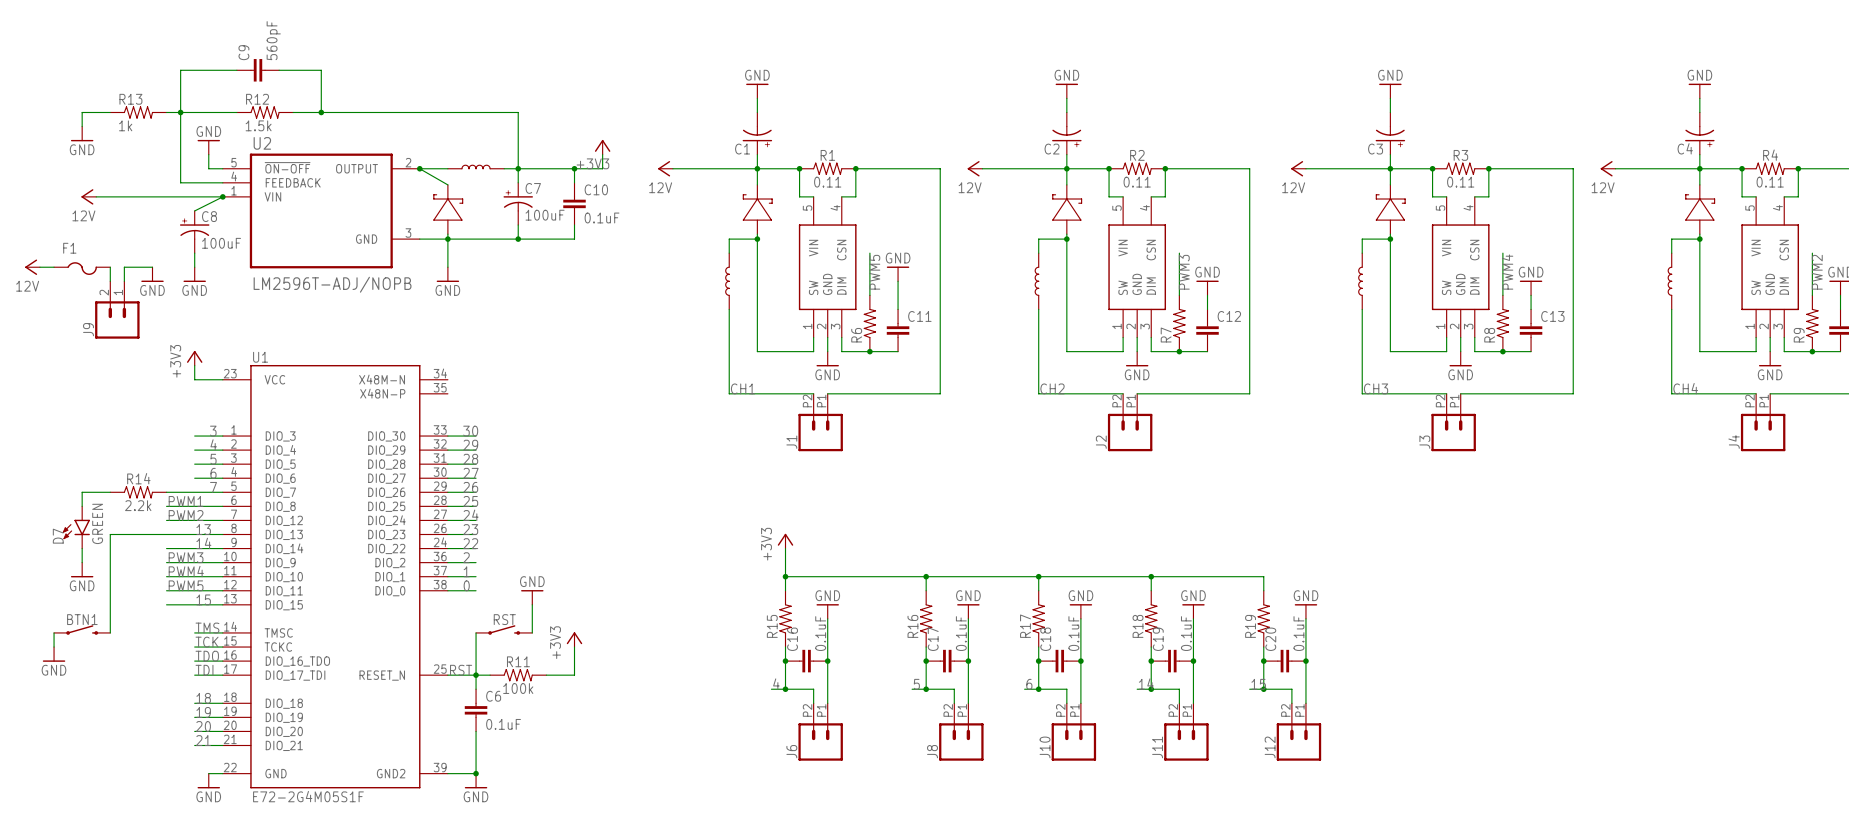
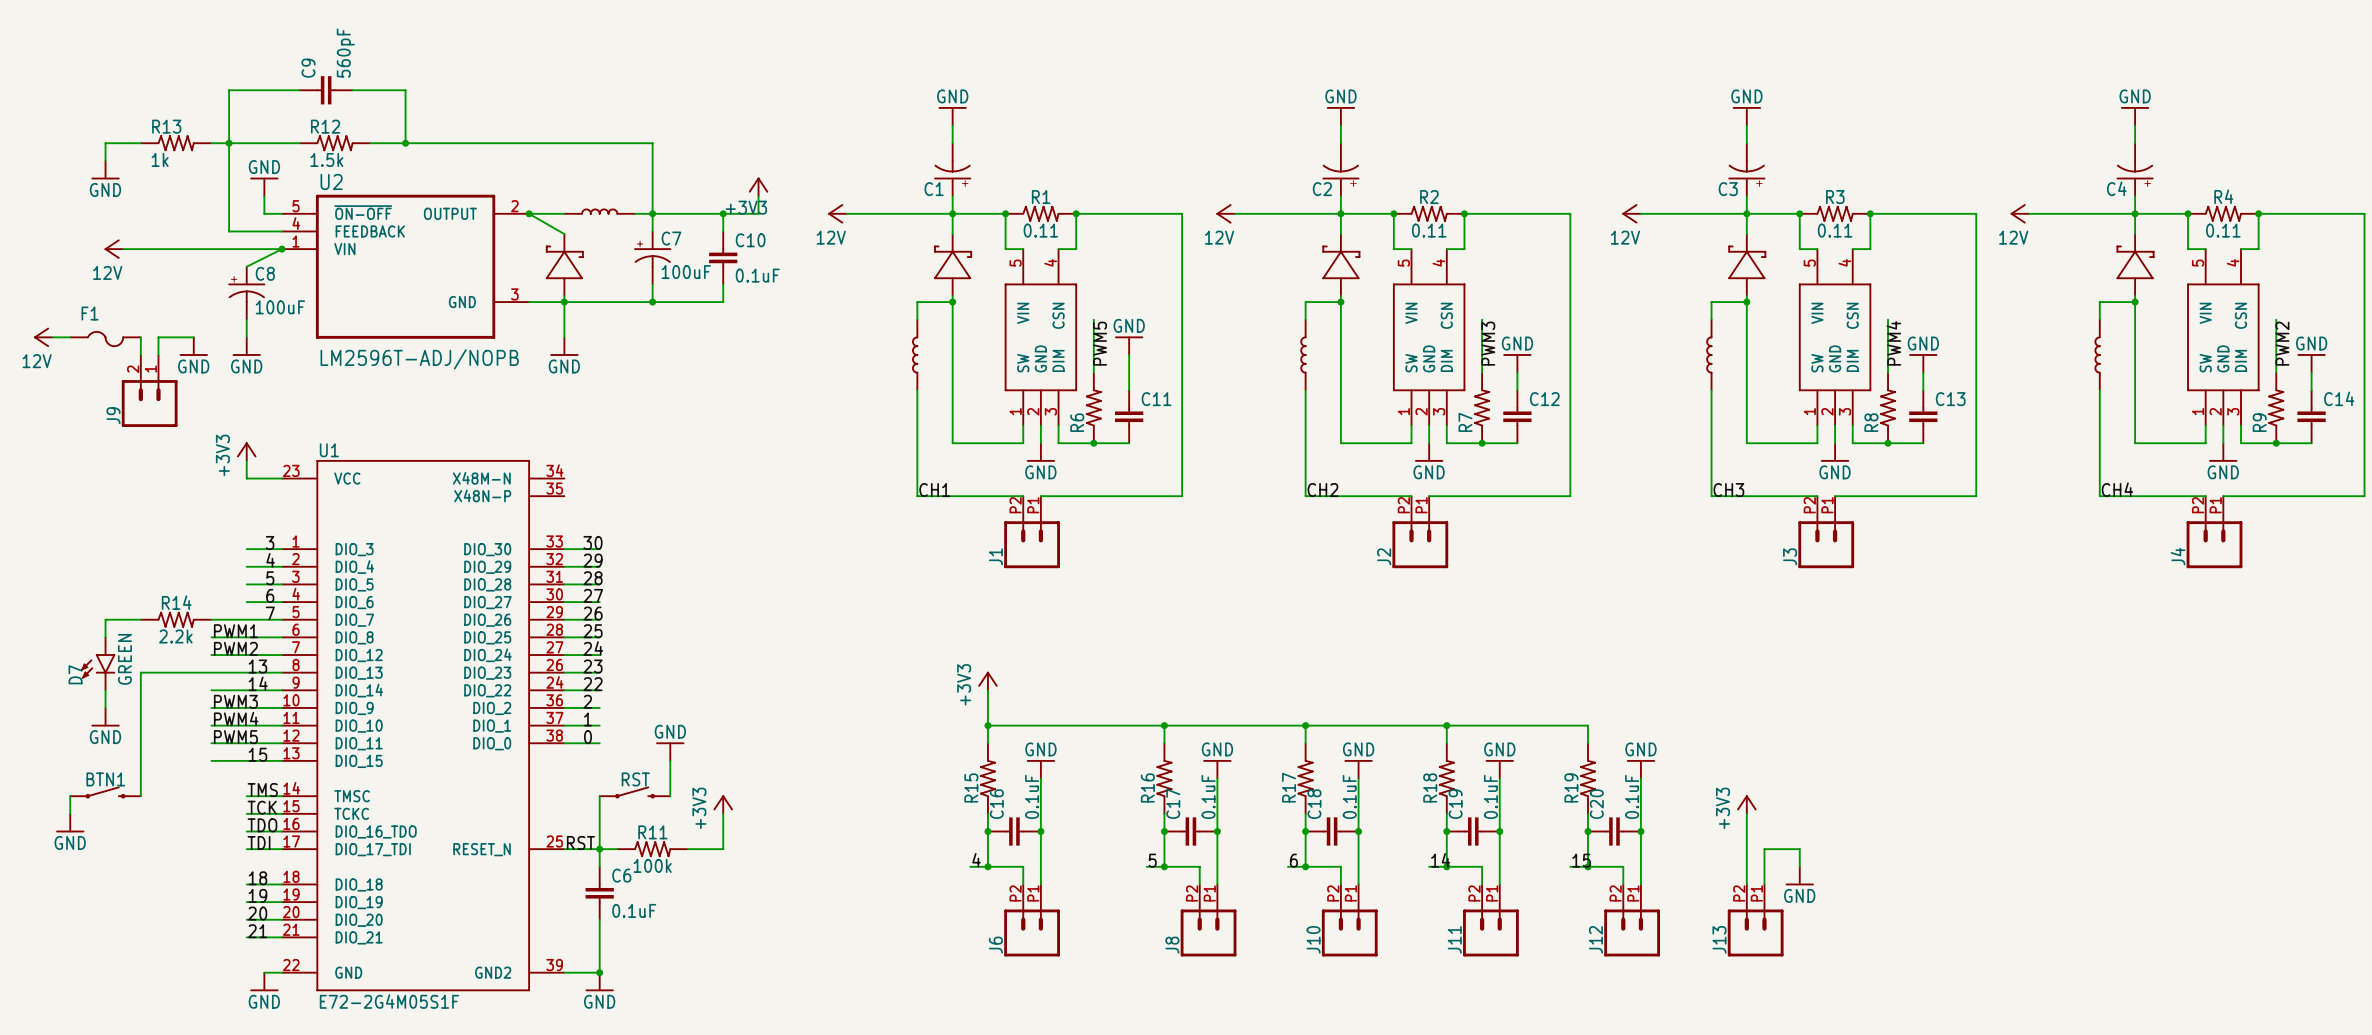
power symbol: none -> +3V3 (1746, 804)
wire: none -> (1746, 813) (1746, 884)
wire: none -> (1799, 866) (1799, 849) (1764, 849) (1764, 884)
power symbol: none -> GND (1799, 876)
J13: none -> (1755, 920)

